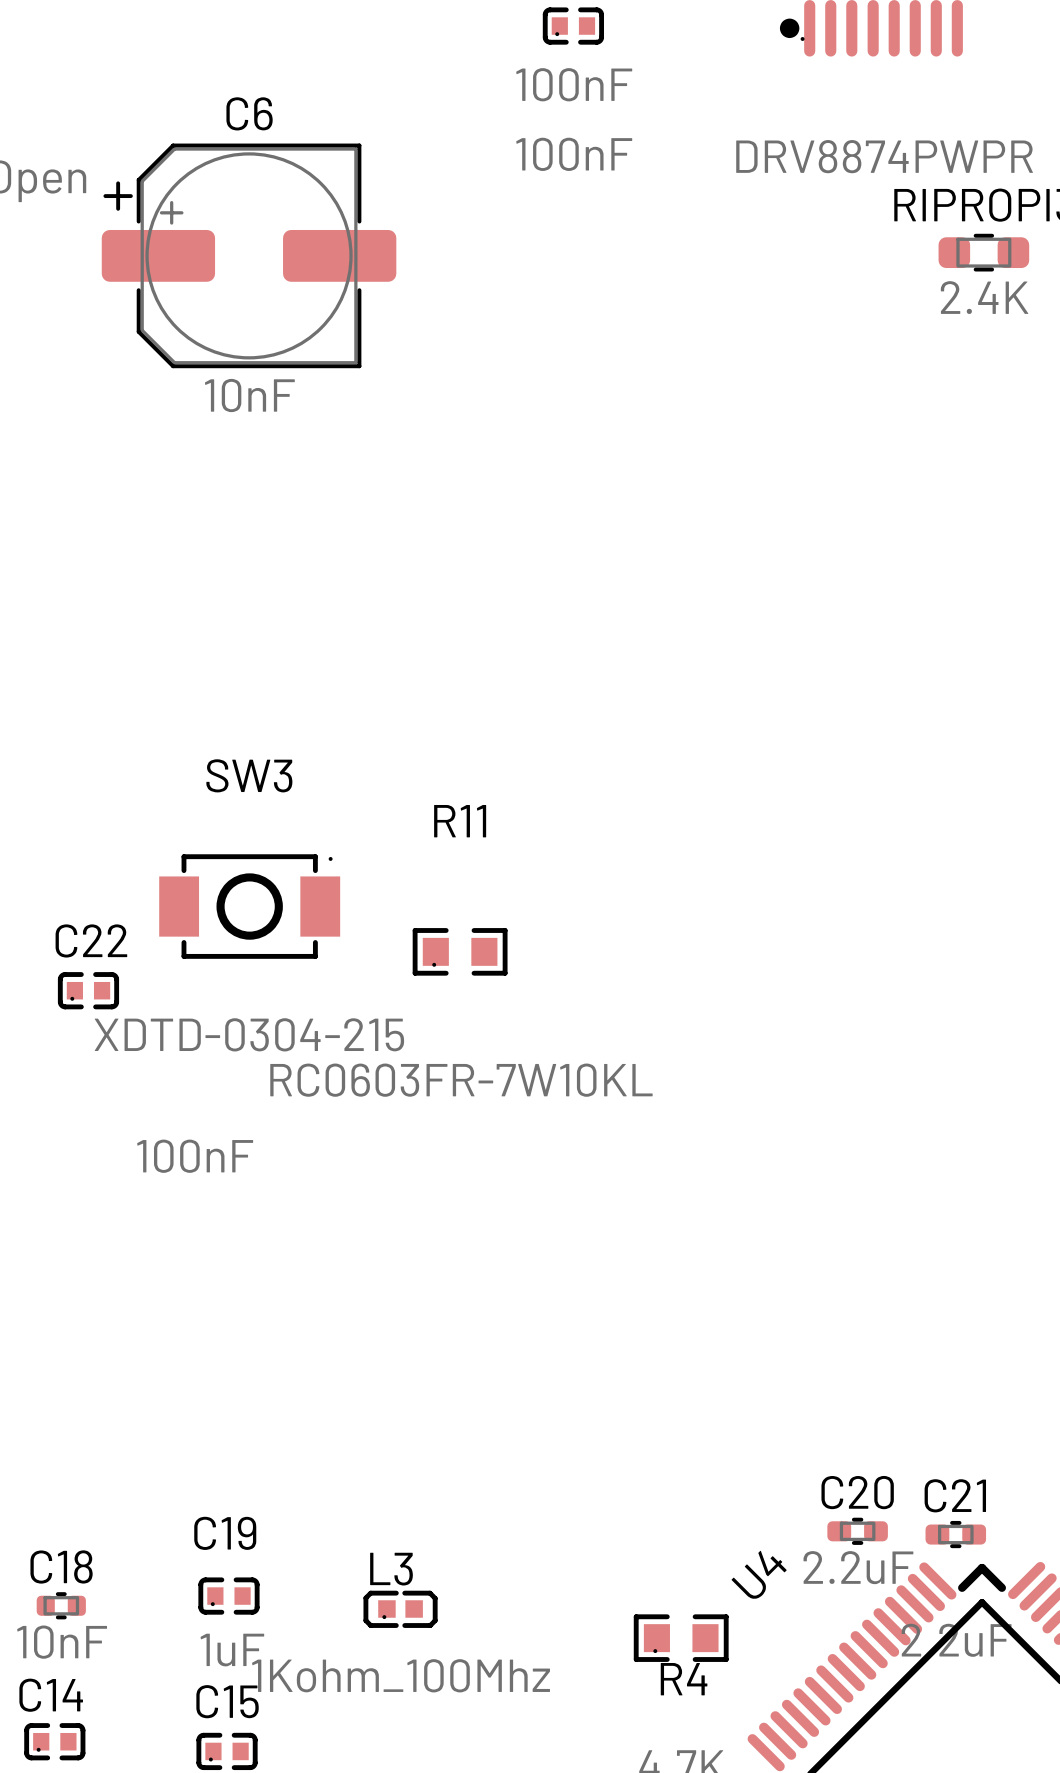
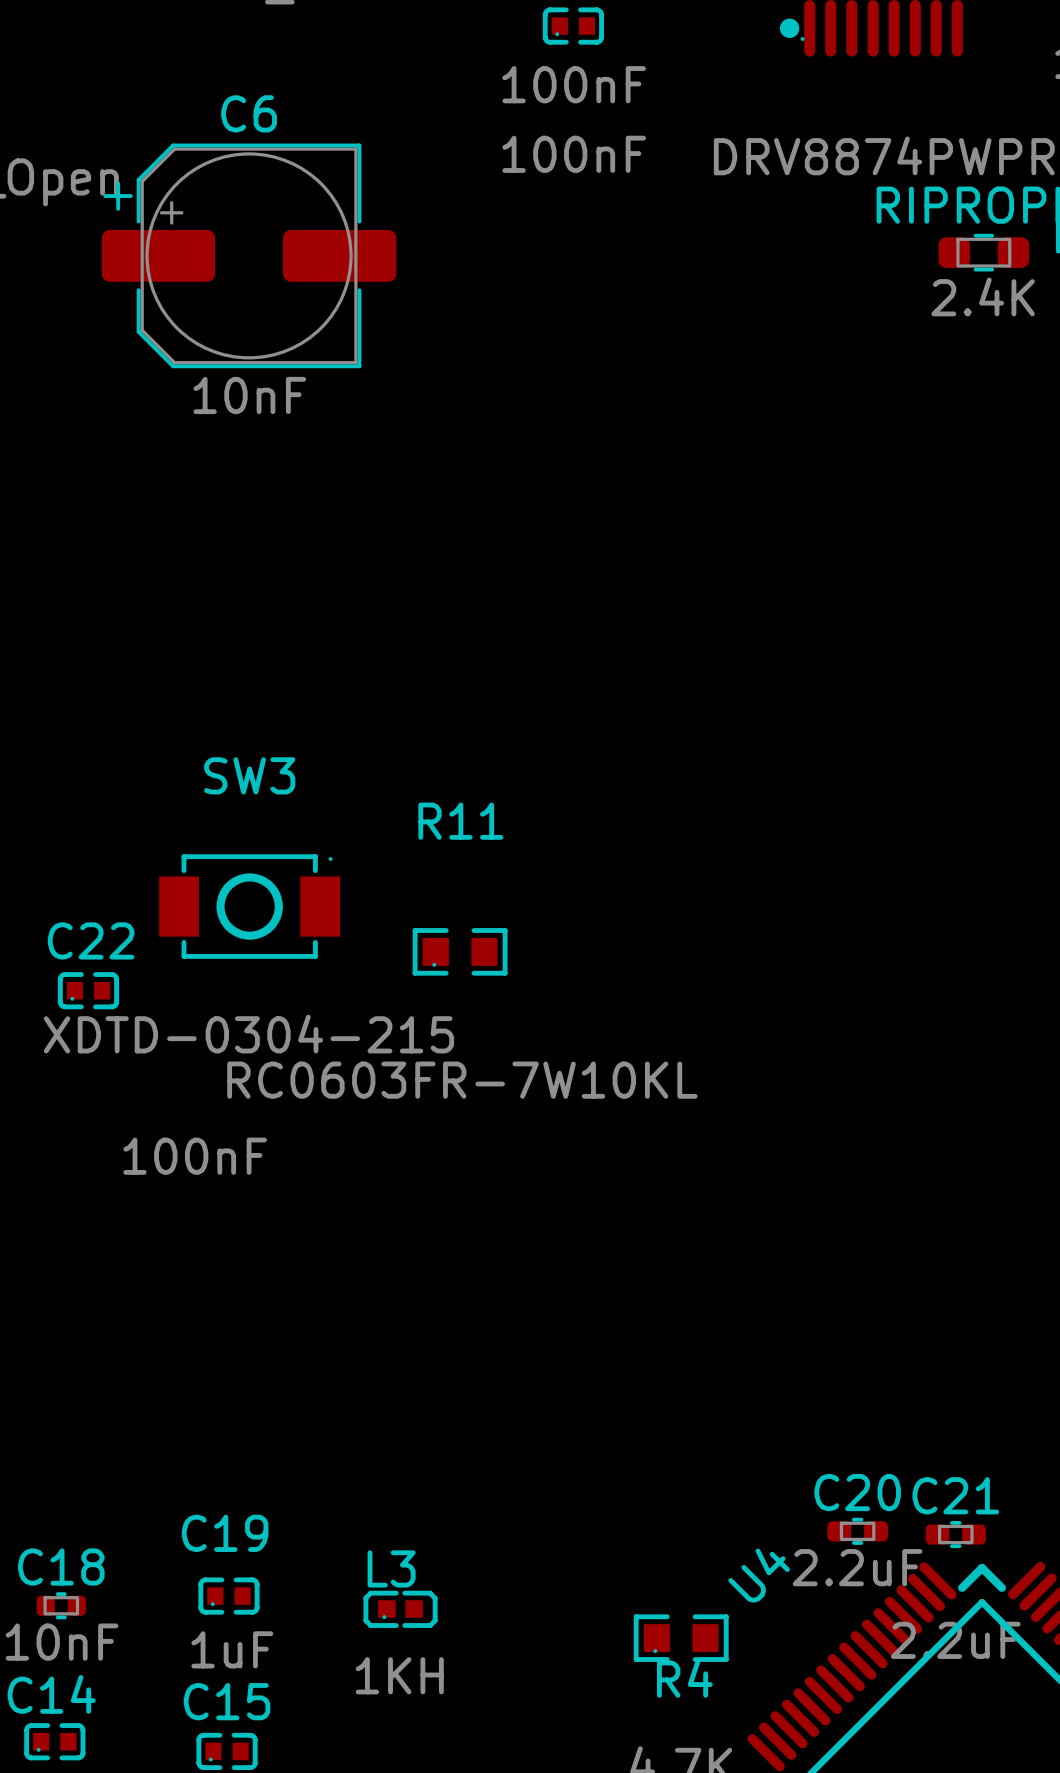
L3 value: 1Kohm_100Mhz (401, 1675) -> 1KH (399, 1675)

